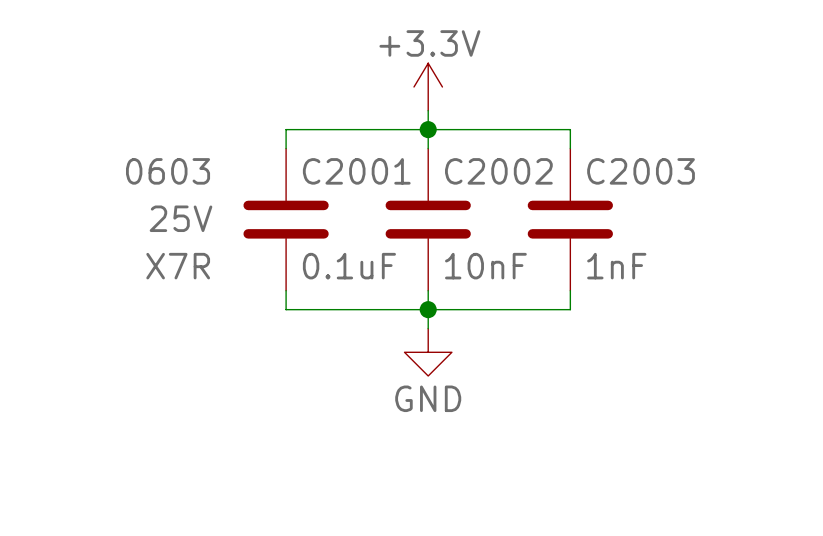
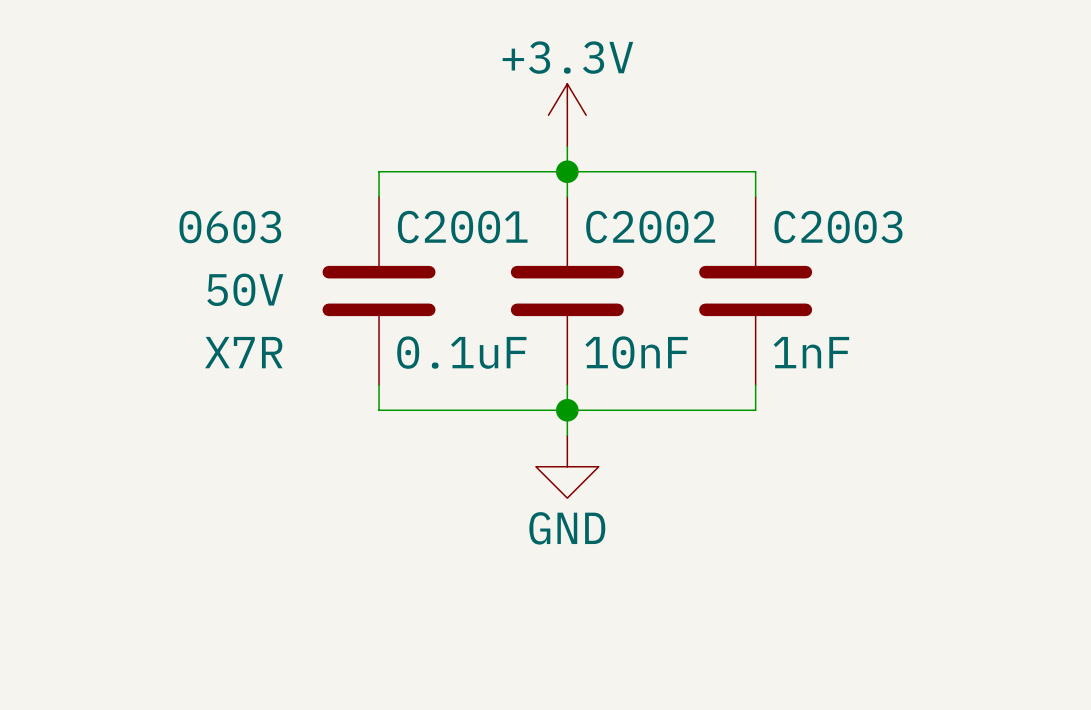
C2001 text: 25V (180, 218) -> 50V (245, 289)

